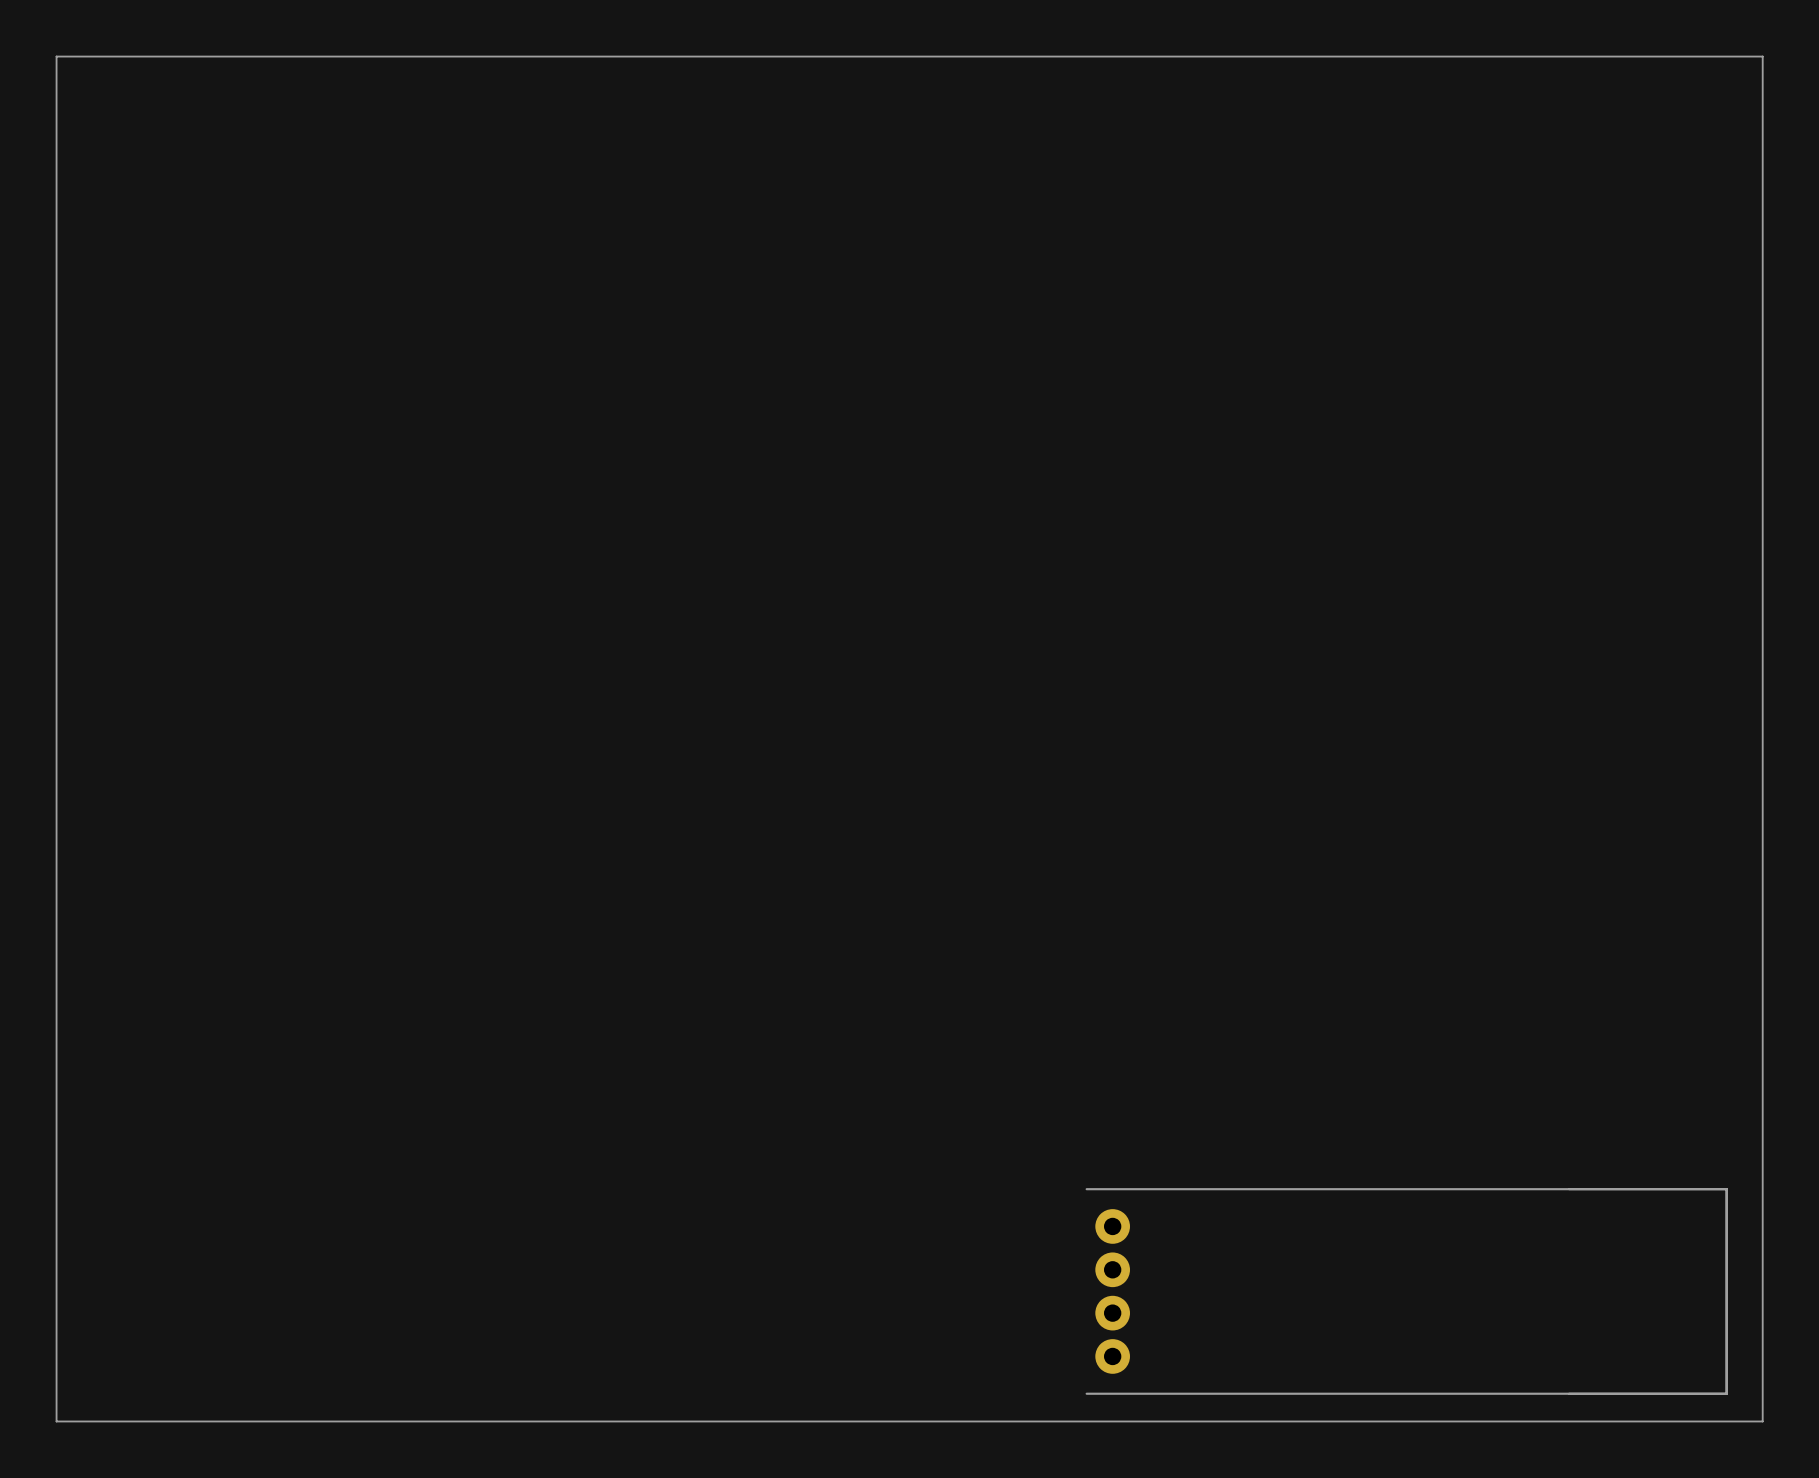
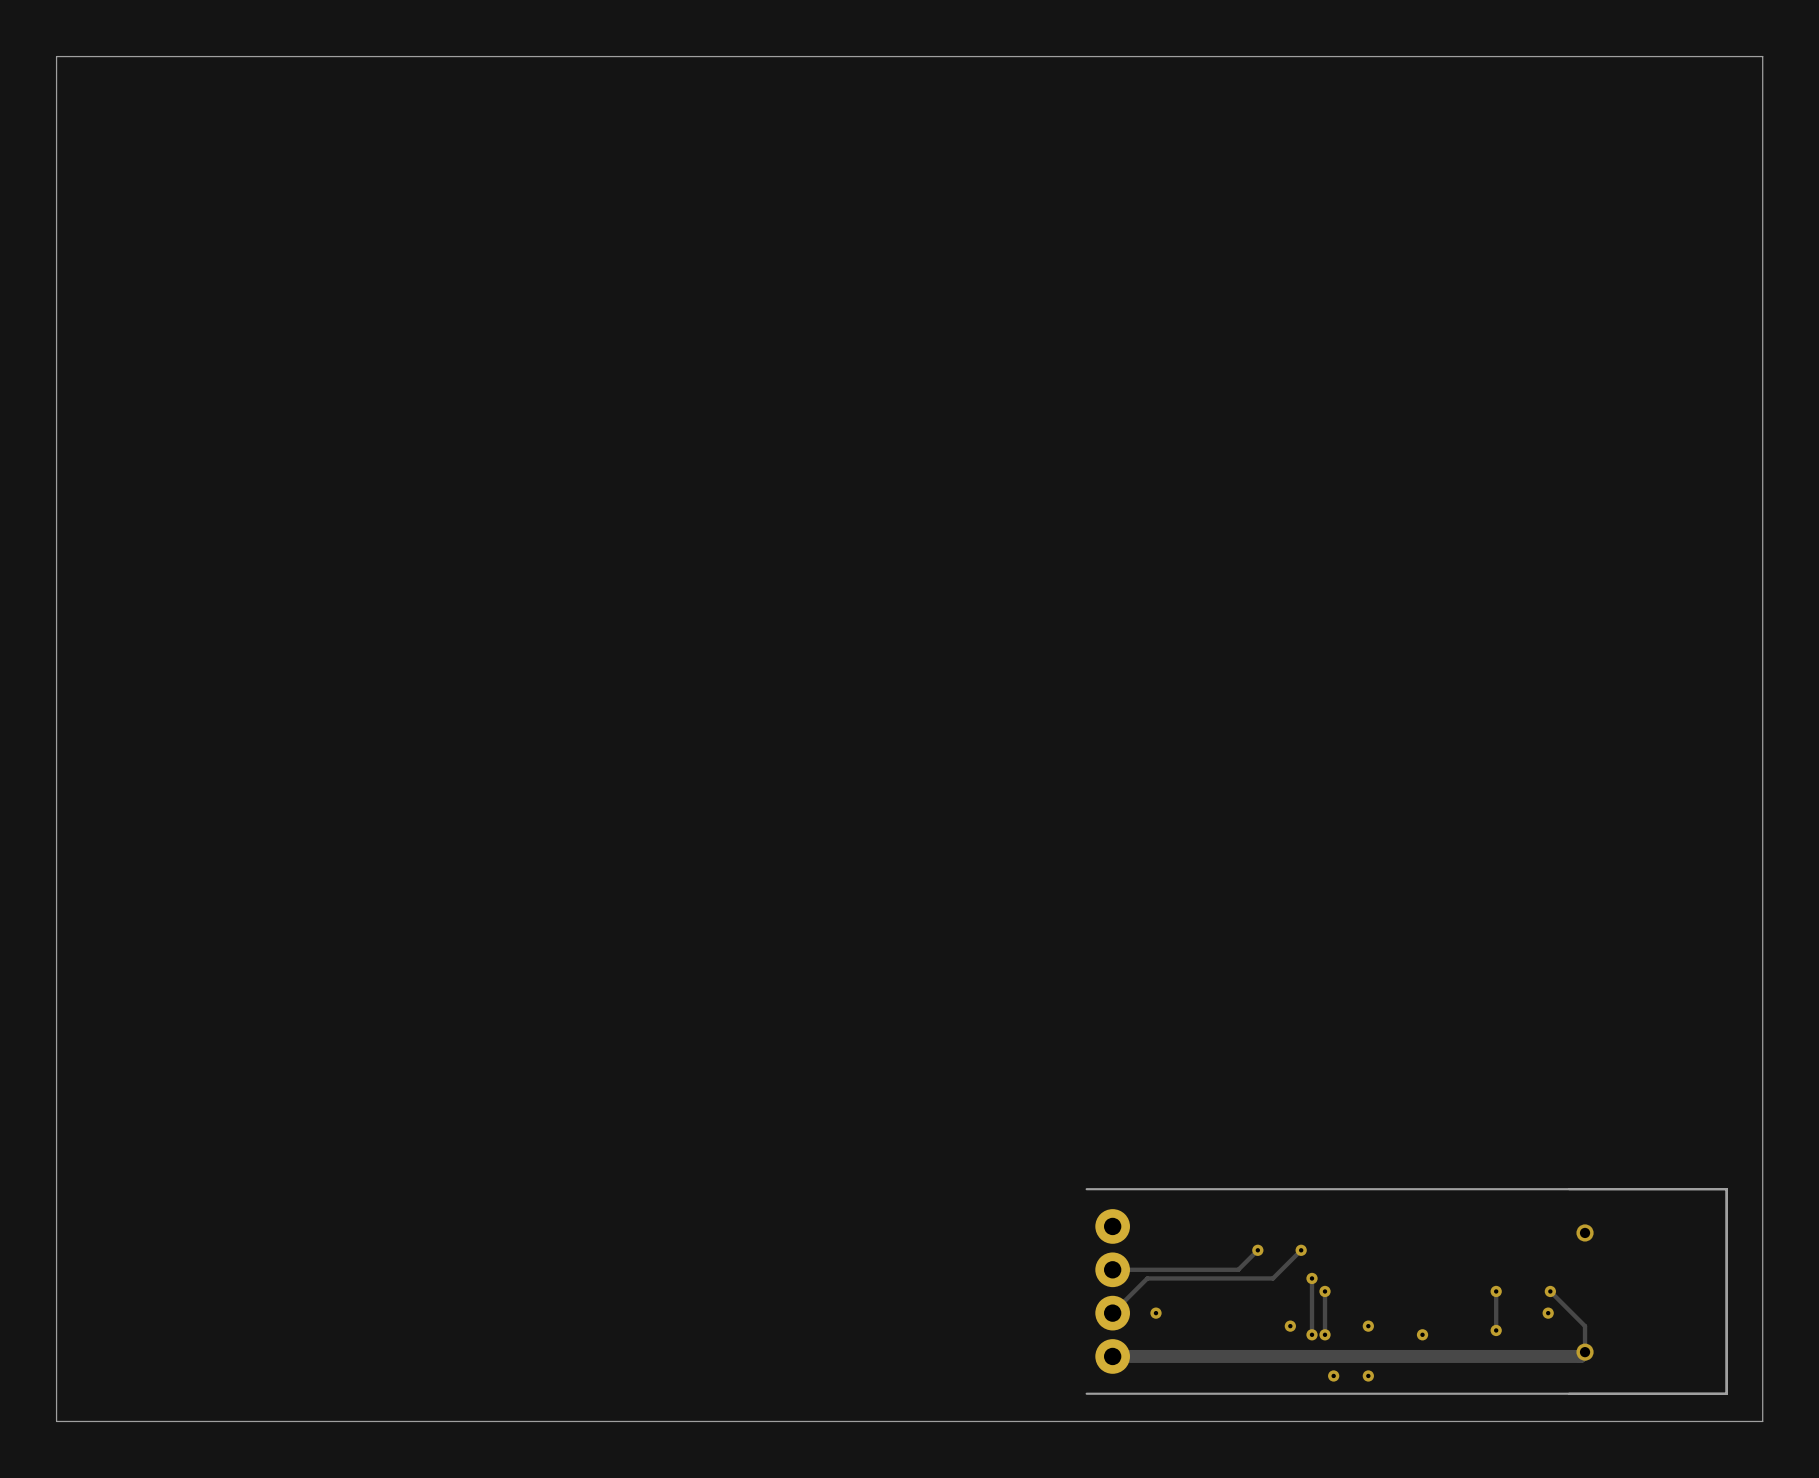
via: none -> (1585, 1232)
track: none -> (1257, 1250) (1238, 1269) (1112, 1269)
via: none -> (1257, 1250)
track: none -> (1301, 1250) (1273, 1278) (1147, 1278) (1112, 1313)
via: none -> (1301, 1250)
track: none -> (1312, 1278) (1312, 1334)
via: none -> (1312, 1278)
track: none -> (1325, 1291) (1325, 1334)
via: none -> (1325, 1291)
track: none -> (1496, 1291) (1496, 1330)
via: none -> (1496, 1291)
track: none -> (1550, 1291) (1585, 1326) (1585, 1352) (1580, 1356) (1112, 1356)
via: none -> (1550, 1291)
via: none -> (1155, 1313)
via: none -> (1548, 1313)
via: none -> (1290, 1326)
via: none -> (1368, 1326)
via: none -> (1496, 1330)
via: none -> (1312, 1334)
via: none -> (1325, 1334)
via: none -> (1422, 1334)
via: none -> (1585, 1352)
via: none -> (1333, 1375)
via: none -> (1368, 1375)

